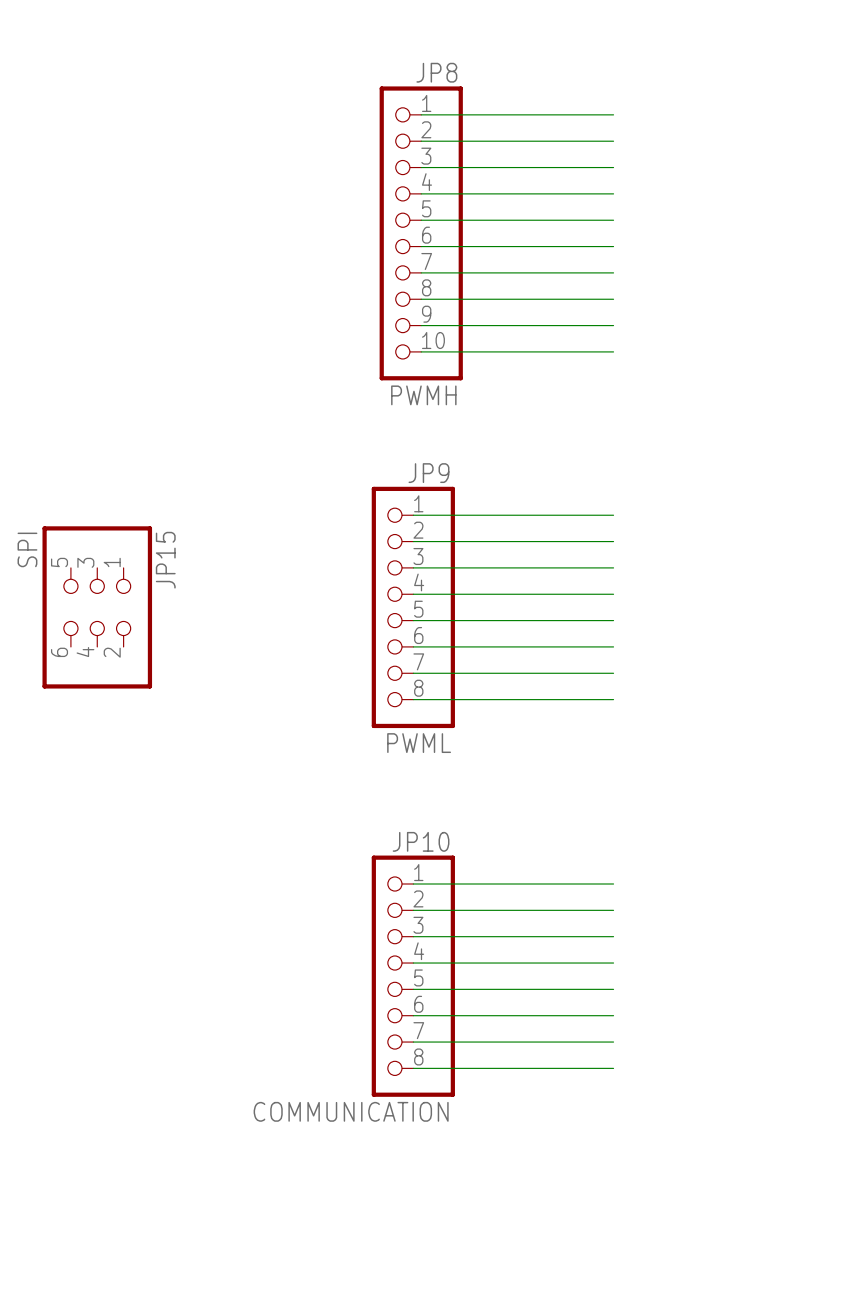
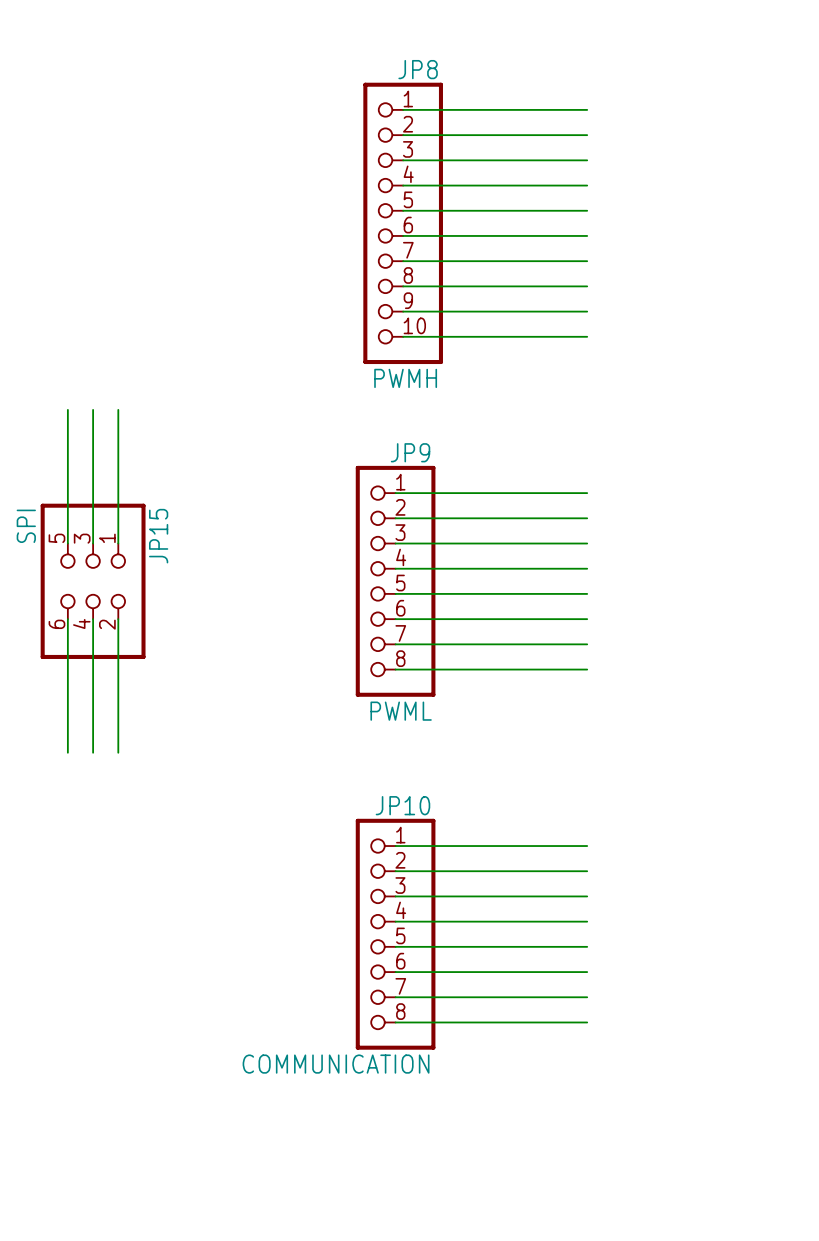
wire: none -> (67, 409) (67, 543)
wire: none -> (93, 409) (93, 543)
wire: none -> (118, 409) (118, 543)
wire: none -> (67, 619) (67, 752)
wire: none -> (93, 619) (93, 752)
wire: none -> (118, 619) (118, 752)

